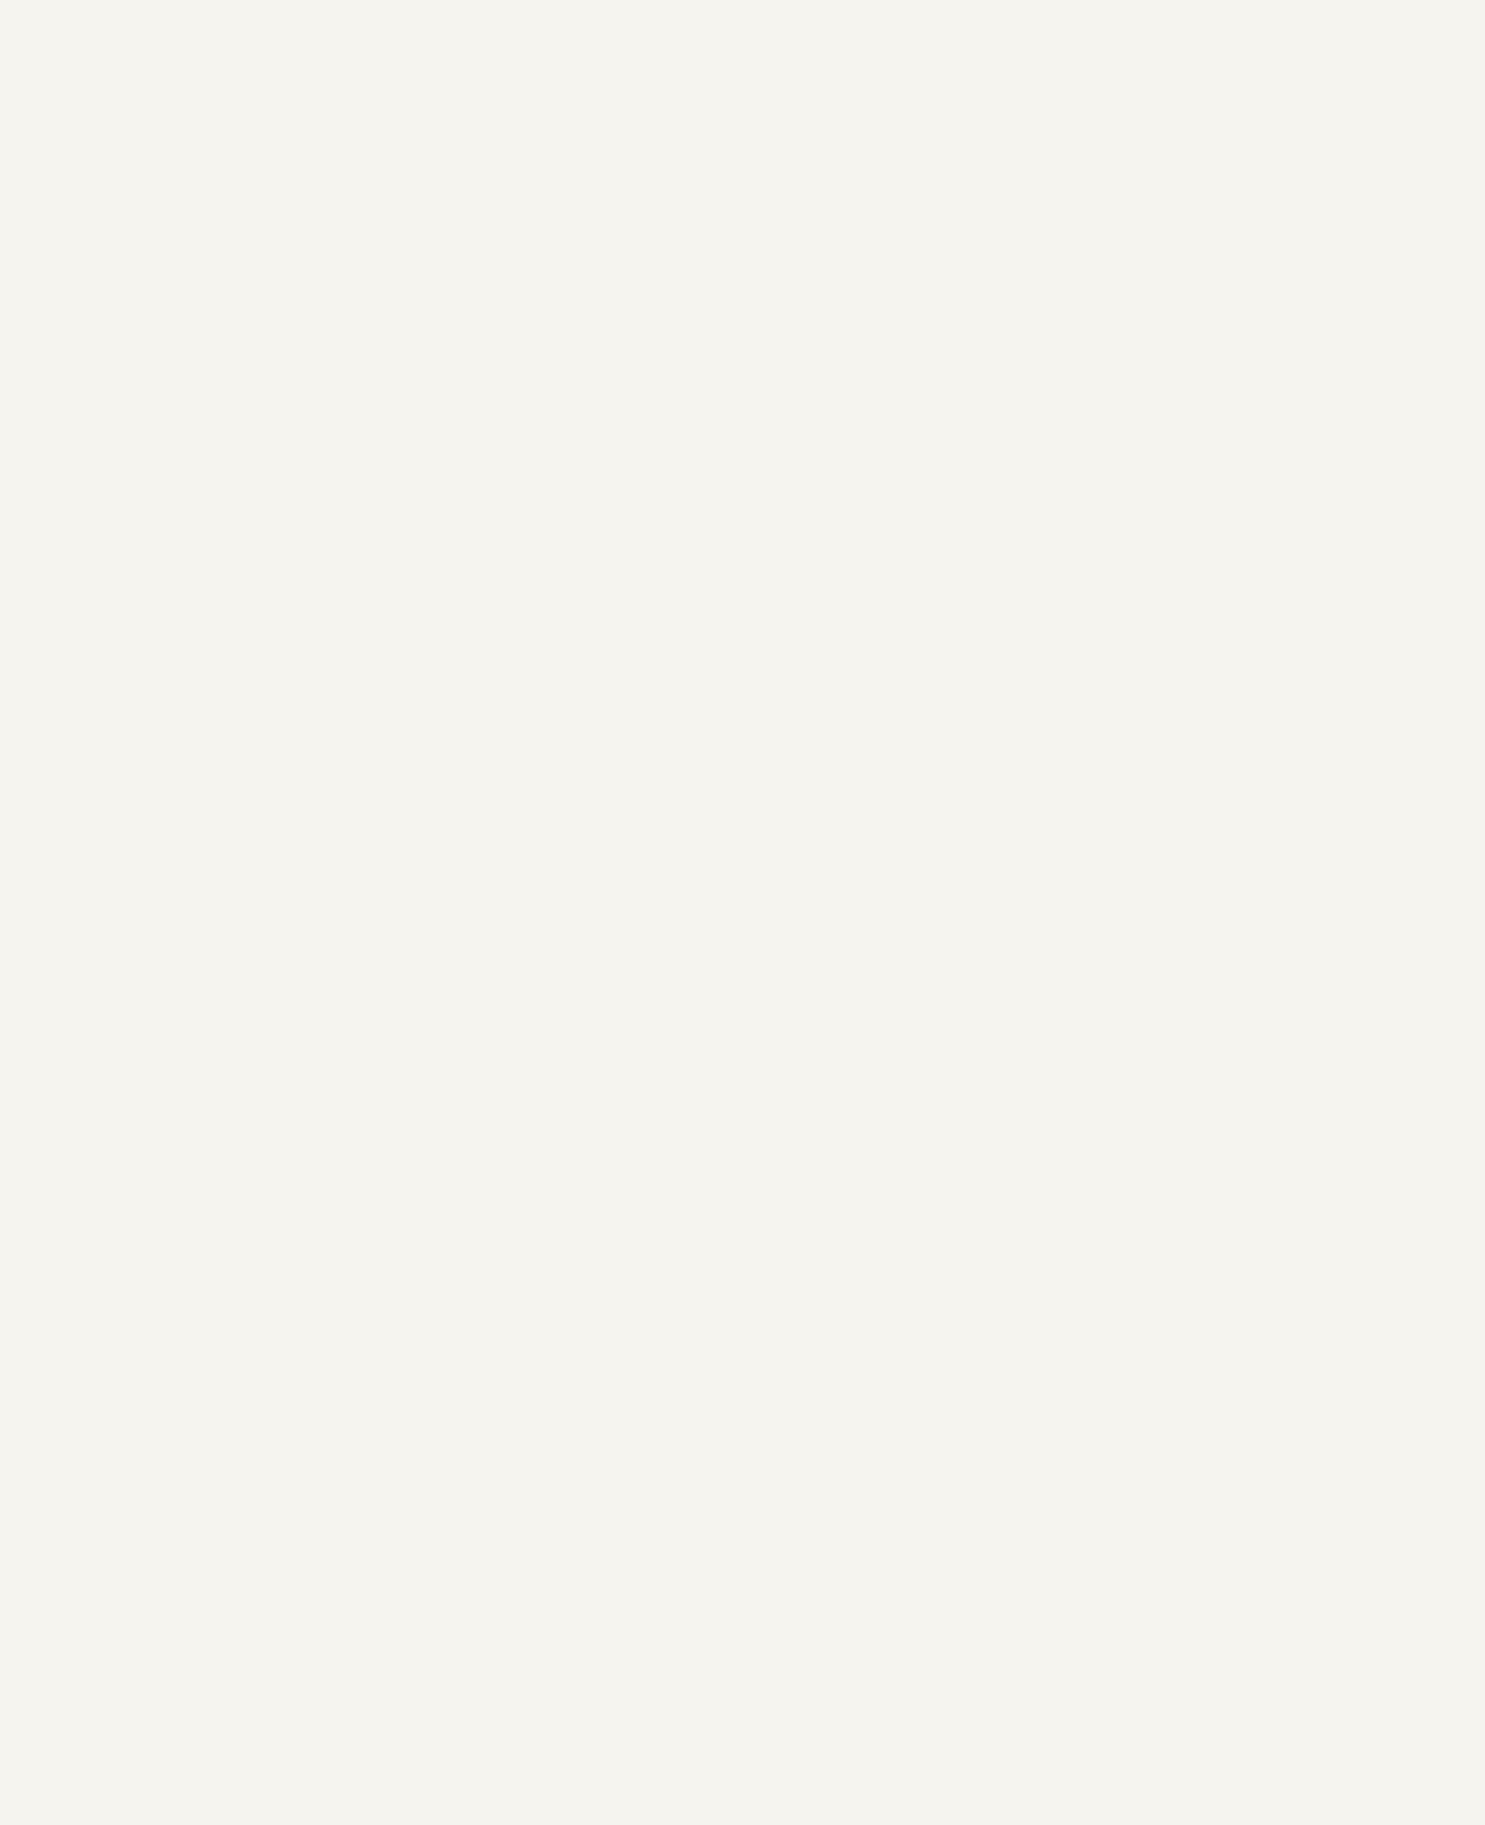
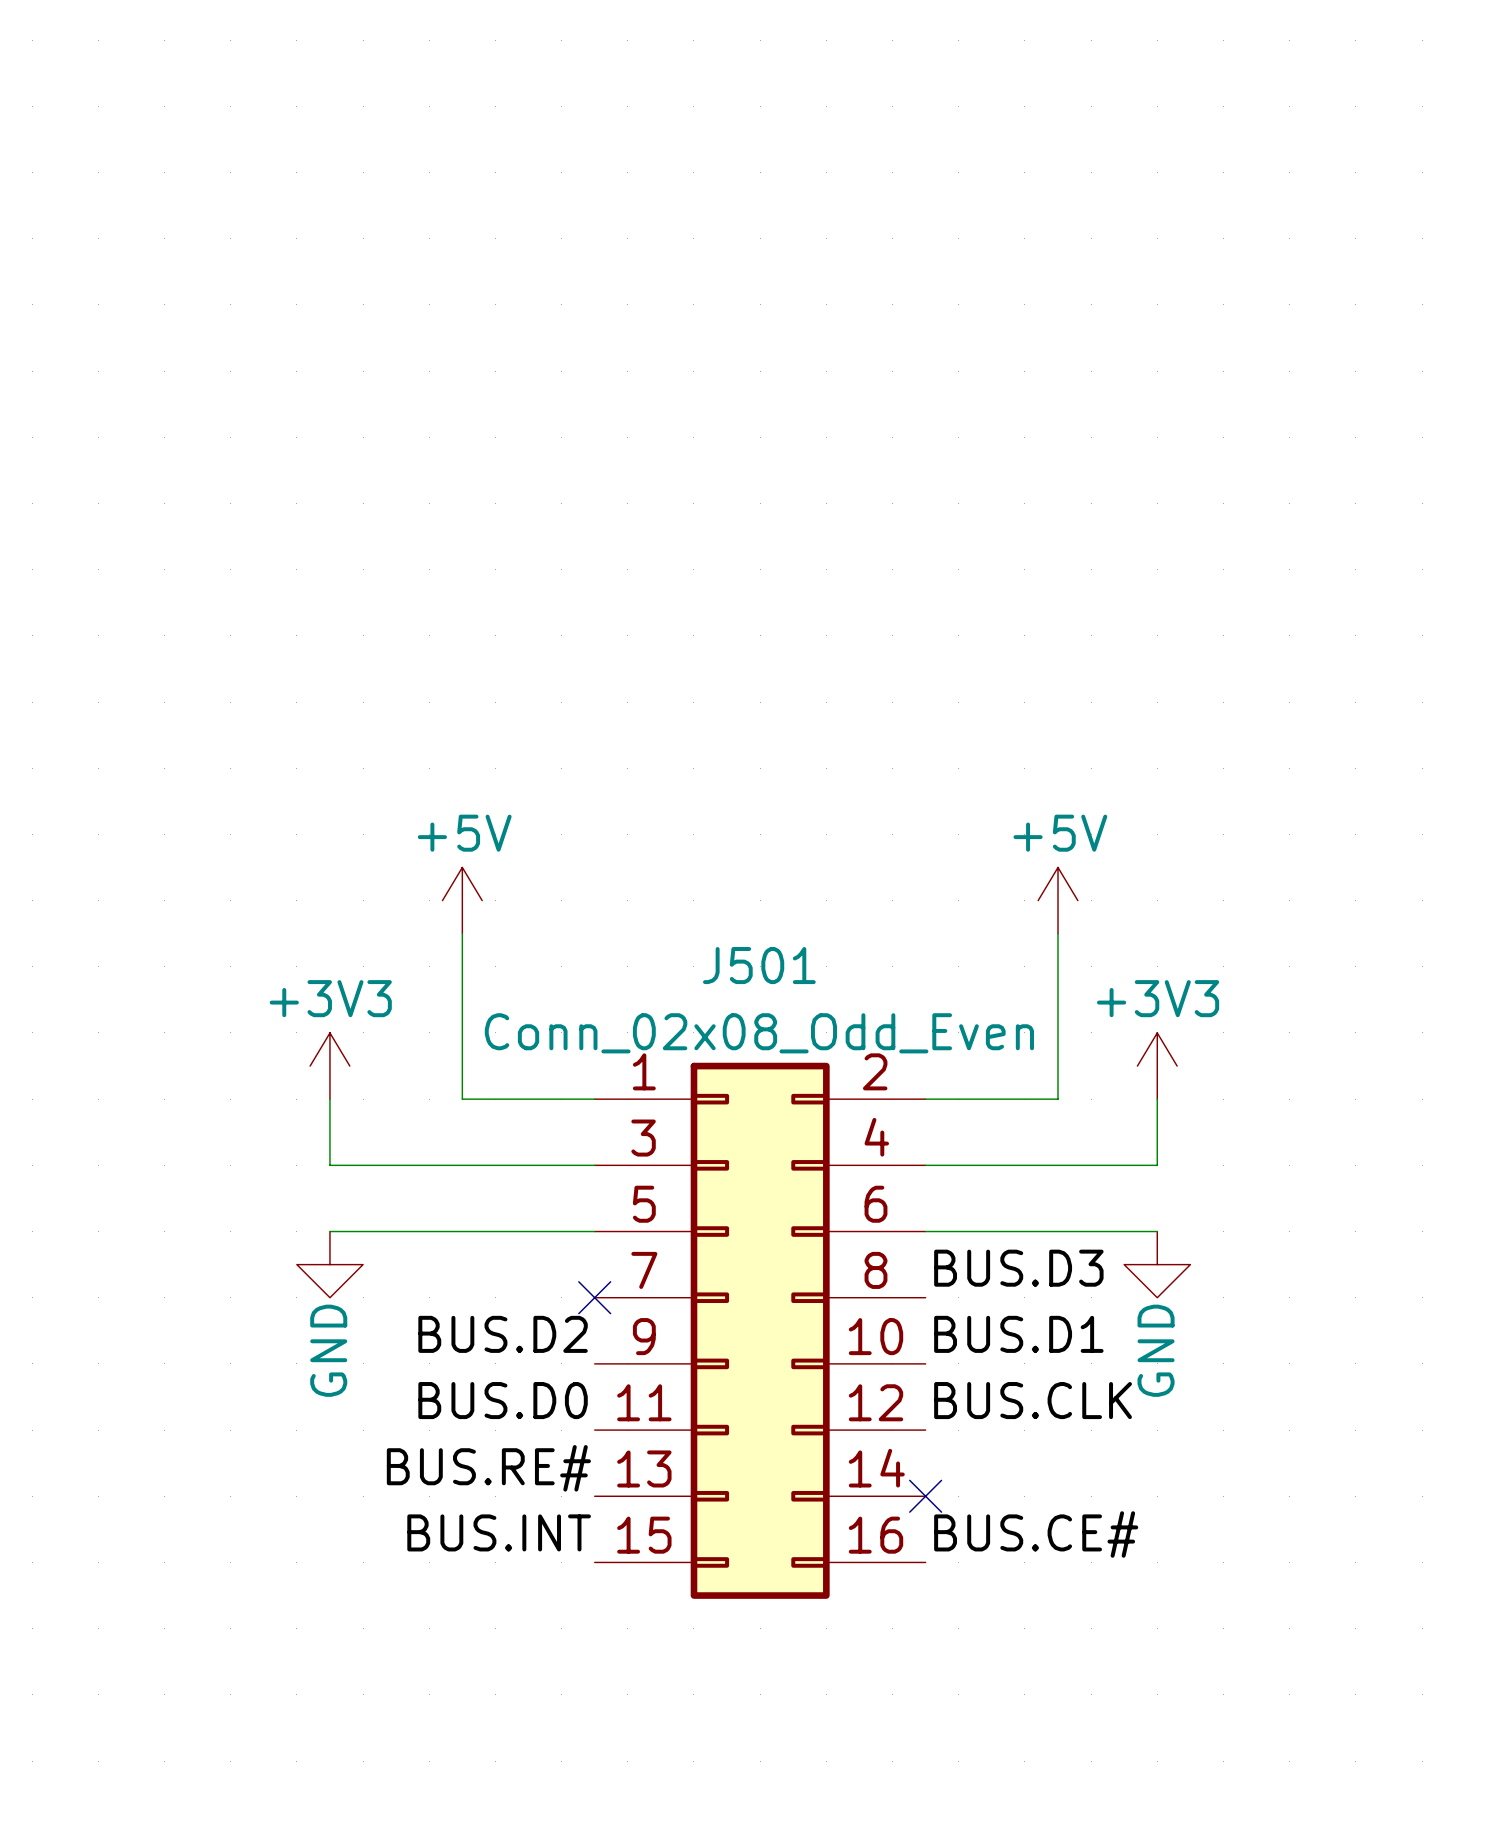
power symbol: none -> +5V (462, 900)
power symbol: none -> +5V (1058, 900)
wire: none -> (462, 933) (462, 1099) (594, 1099)
wire: none -> (1058, 933) (1058, 1099) (925, 1099)
power symbol: none -> +3V3 (329, 1066)
power symbol: none -> +3V3 (1157, 1066)
wire: none -> (329, 1099) (329, 1165) (594, 1165)
wire: none -> (1157, 1099) (1157, 1165) (925, 1165)
wire: none -> (329, 1231) (594, 1231)
wire: none -> (925, 1231) (1157, 1231)
power symbol: none -> GND (329, 1264)
power symbol: none -> GND (1157, 1264)
label: none -> BUS.D3 (1018, 1268)
no-connect mark: none -> (594, 1297)
J501: none -> Conn_02x08_Odd_Even (760, 1330)
label: none -> BUS.D2 (503, 1334)
label: none -> BUS.D1 (1018, 1334)
label: none -> BUS.D0 (503, 1400)
label: none -> BUS.CLK (1033, 1400)
label: none -> BUS.RE# (488, 1468)
no-connect mark: none -> (925, 1496)
label: none -> BUS.INT (499, 1532)
label: none -> BUS.CE# (1036, 1534)

